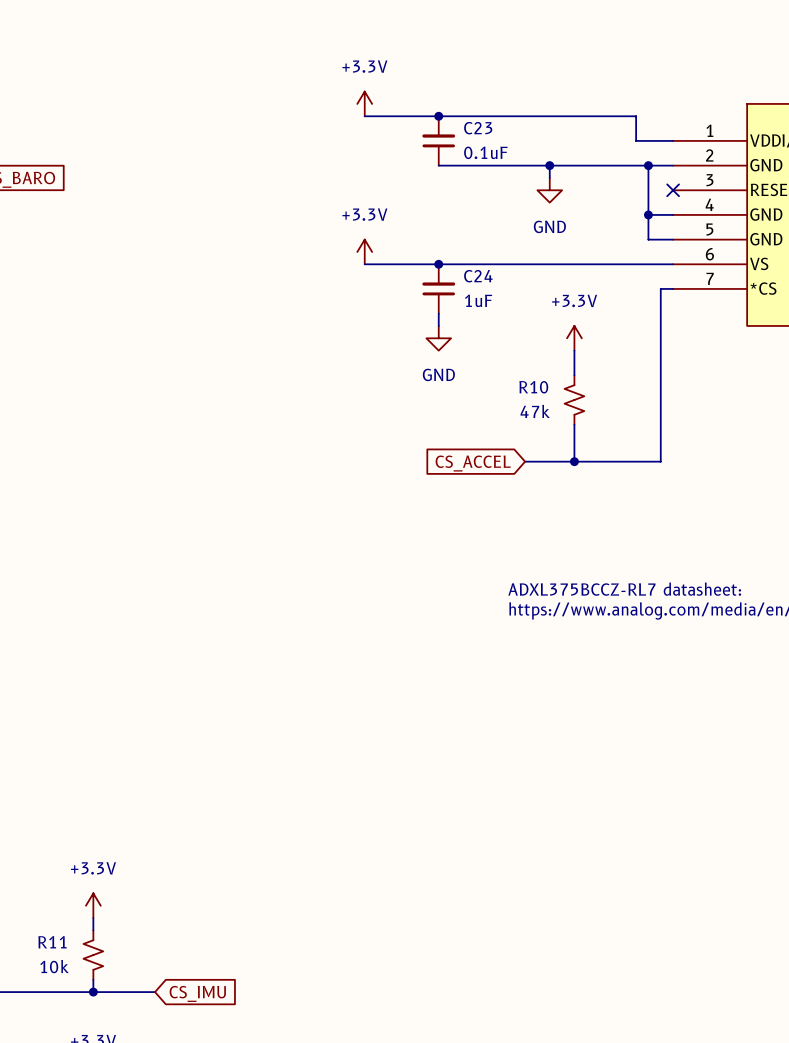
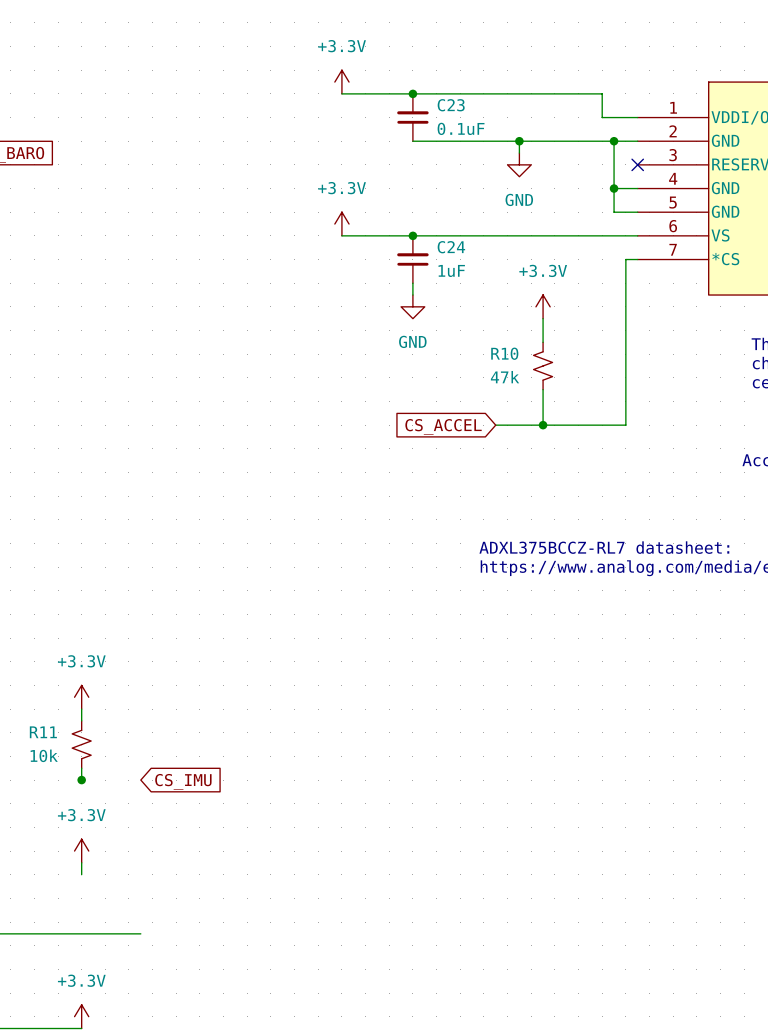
power symbol: none -> +3.3V (81, 697)
wire: none -> (81, 709) (81, 720)
junction: none -> (81, 780)
R11 position: (93, 955) -> (81, 744)
wire: (93, 979) (93, 992) -> (81, 768) (81, 780)
junction: (93, 992) -> none
global label position: CS_IMU (197, 993) -> CS_IMU (183, 781)

